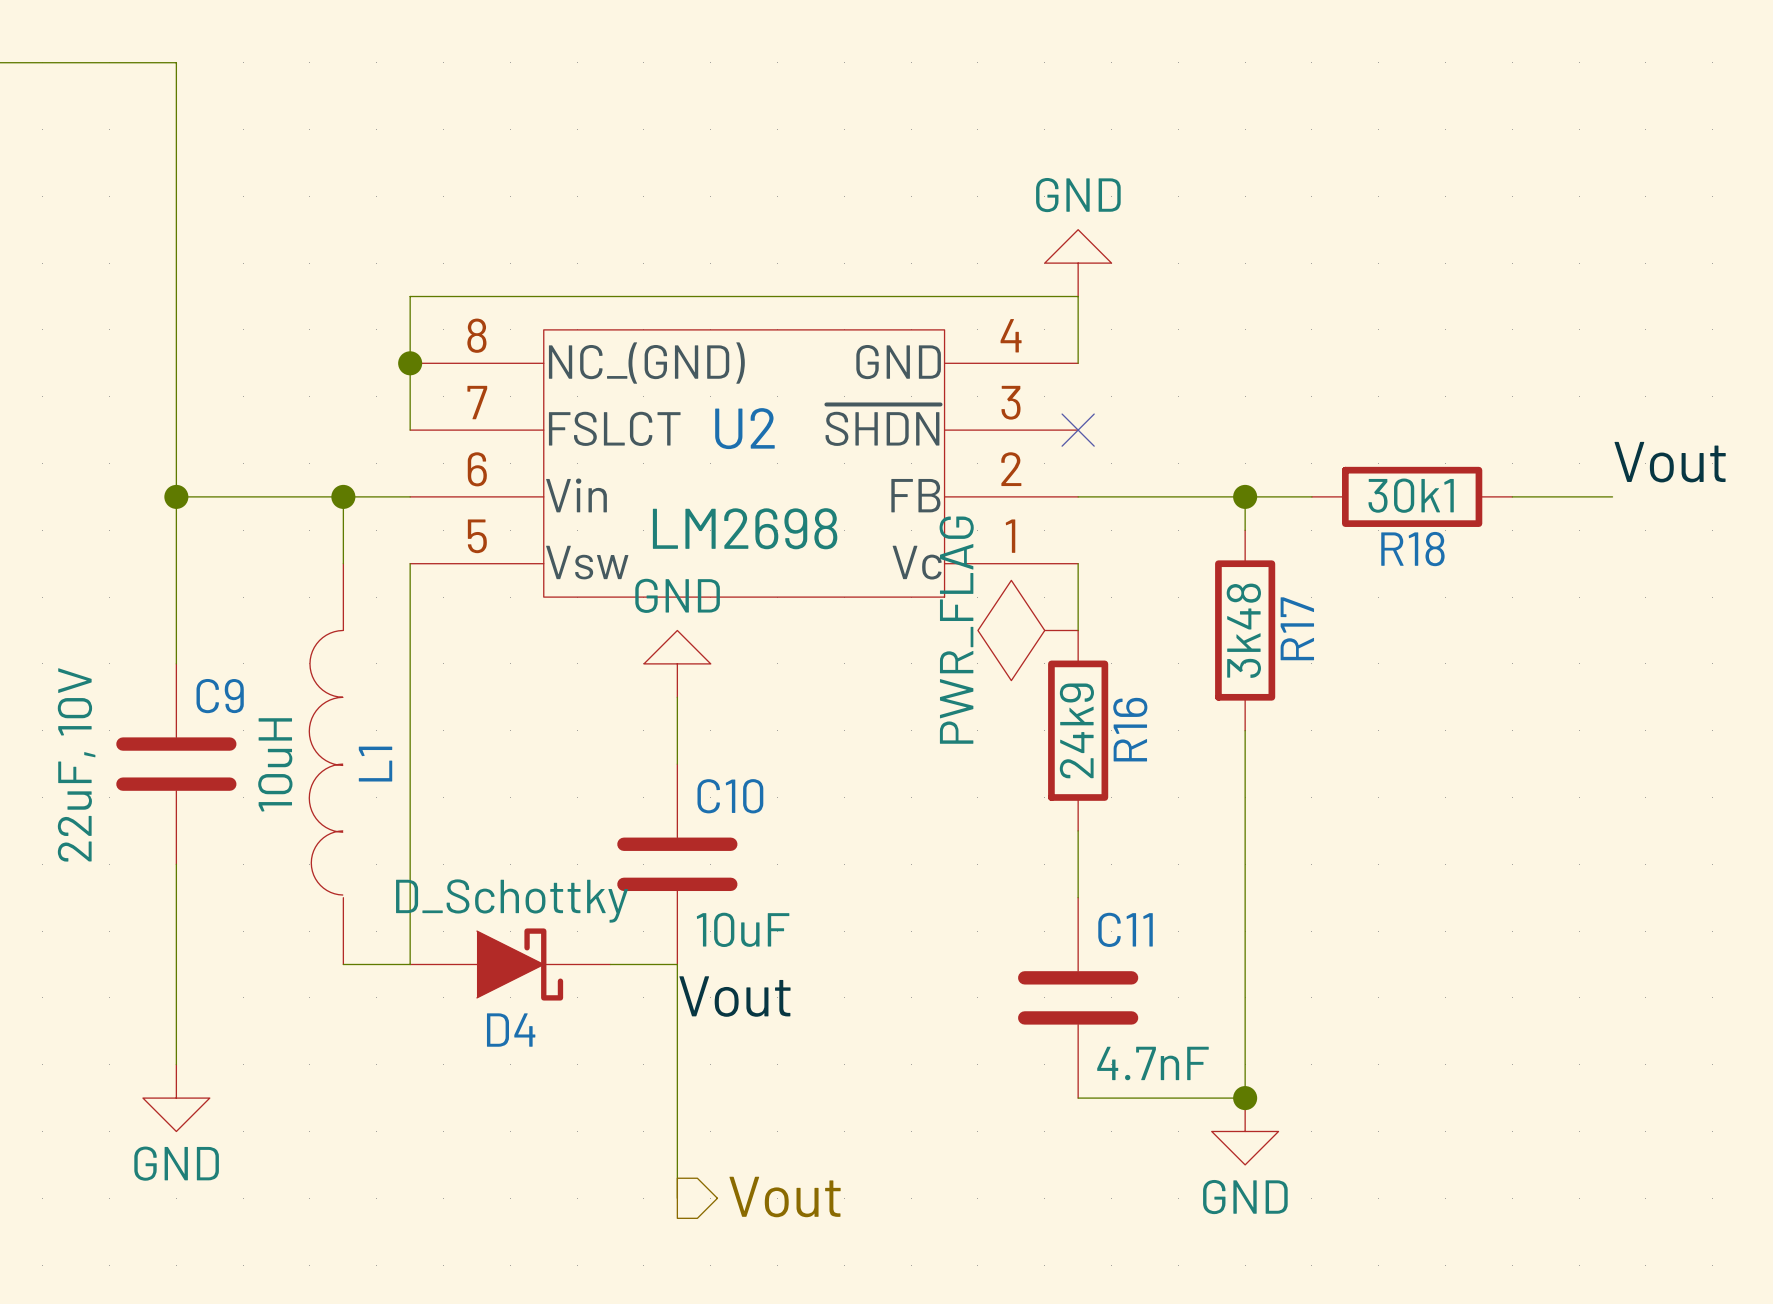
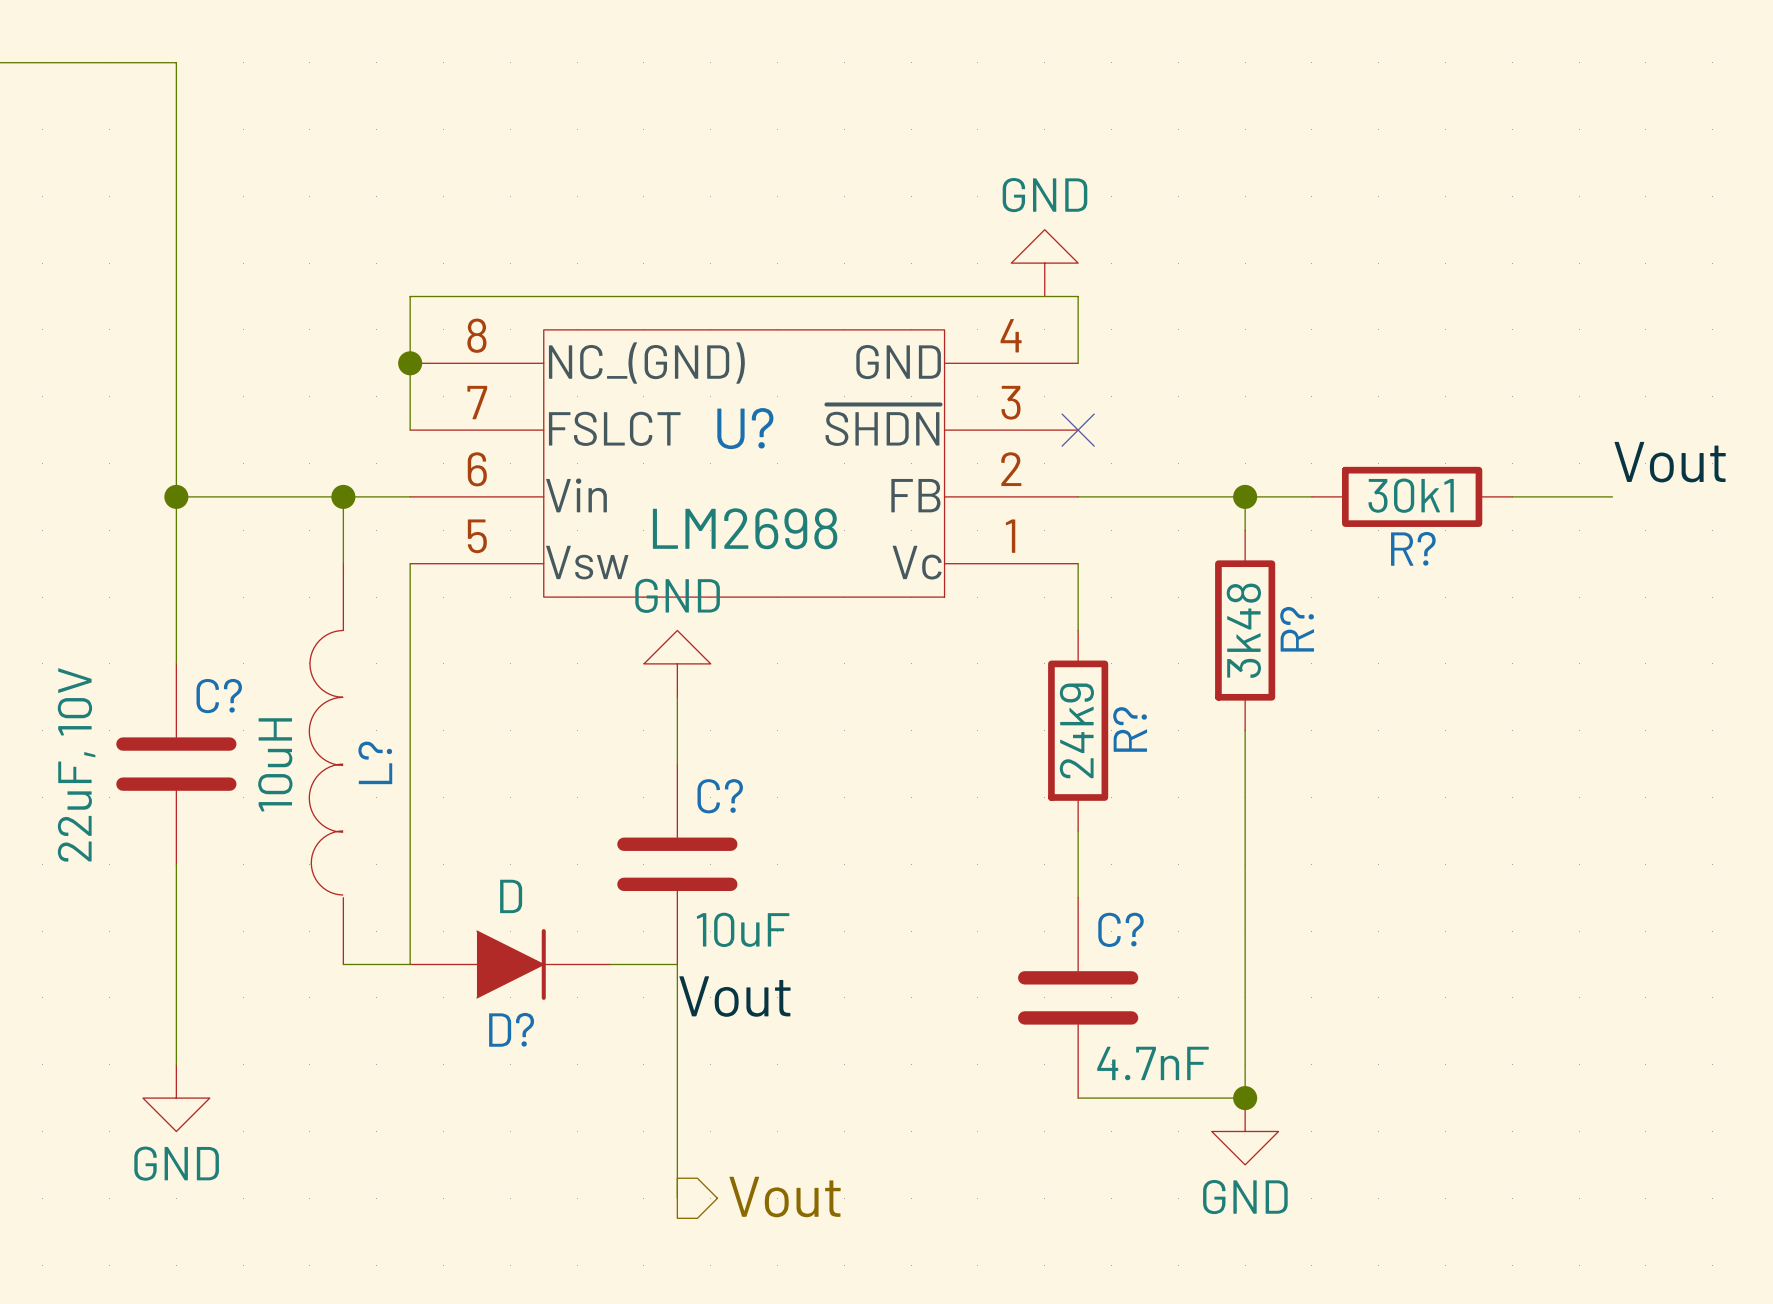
power symbol position: GND (1078, 263) -> GND (1044, 263)
U2 name: U2 (744, 428) -> U? (745, 428)
R18 name: R18 (1412, 549) -> R? (1413, 548)
R17 name: R17 (1297, 628) -> R? (1297, 629)
power symbol: PWR_FLAG (1028, 630) -> none
C9 name: C9 (220, 696) -> C? (219, 696)
R16 name: R16 (1130, 729) -> R? (1130, 729)
L1 name: L1 (375, 764) -> L? (375, 762)
C10 name: C10 (730, 796) -> C? (720, 796)
C11 name: C11 (1125, 929) -> C? (1121, 929)
D4: D_Schottky (510, 964) -> none
D?: none -> D (510, 964)

